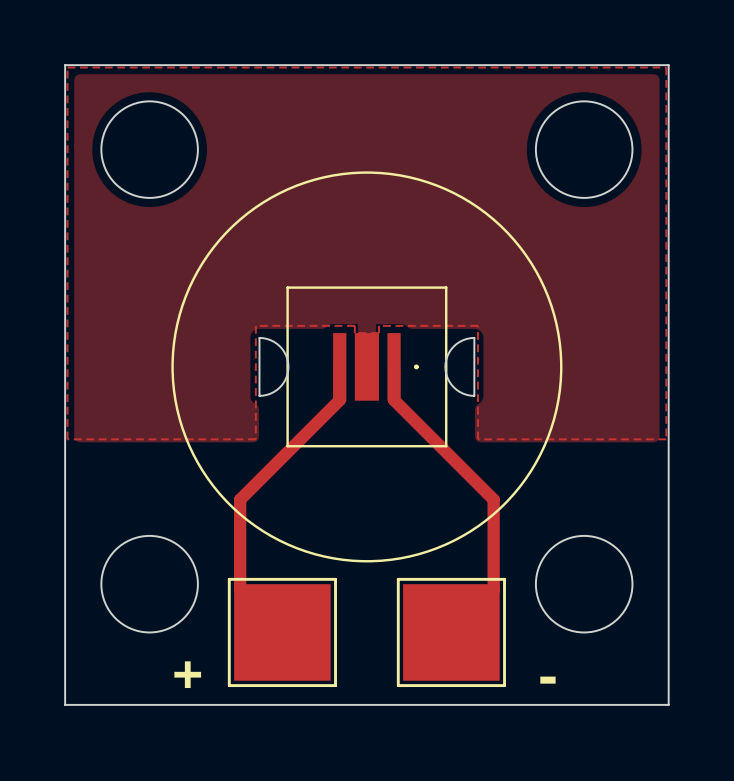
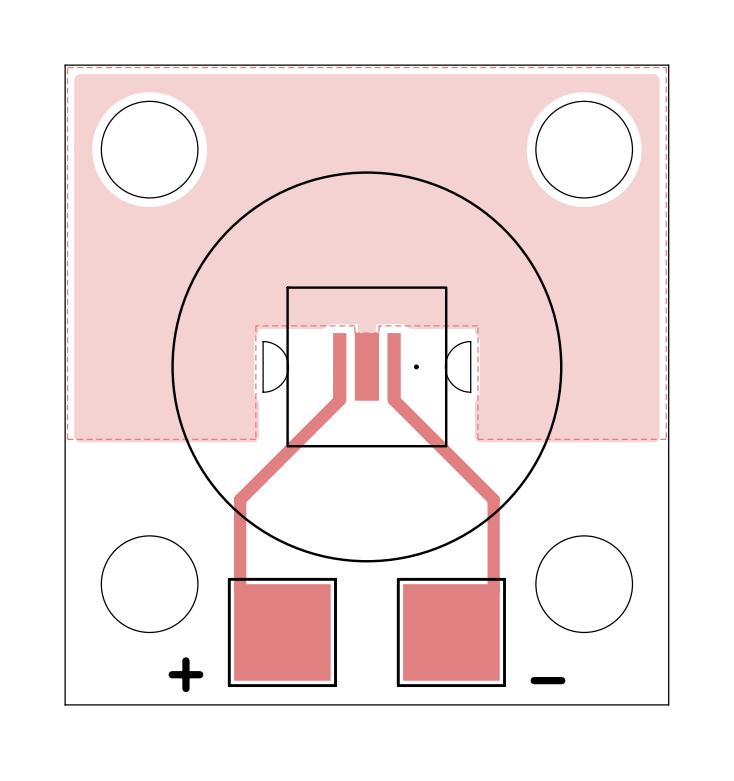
drawing shape: [171, 171, 563, 563] -> [171, 171, 563, 563]
line: (287, 287) (446, 287) (446, 446) (287, 446) (287, 287) -> none
board edge: (259, 337) (259, 395) (270, 393) (279, 387) (286, 377) (288, 366) (286, 355) (279, 346) (270, 340) (259, 337) -> none
board edge: (474, 337) (474, 395) (463, 393) (453, 387) (447, 377) (445, 366) (447, 355) (453, 346) (463, 340) (474, 337) -> none

